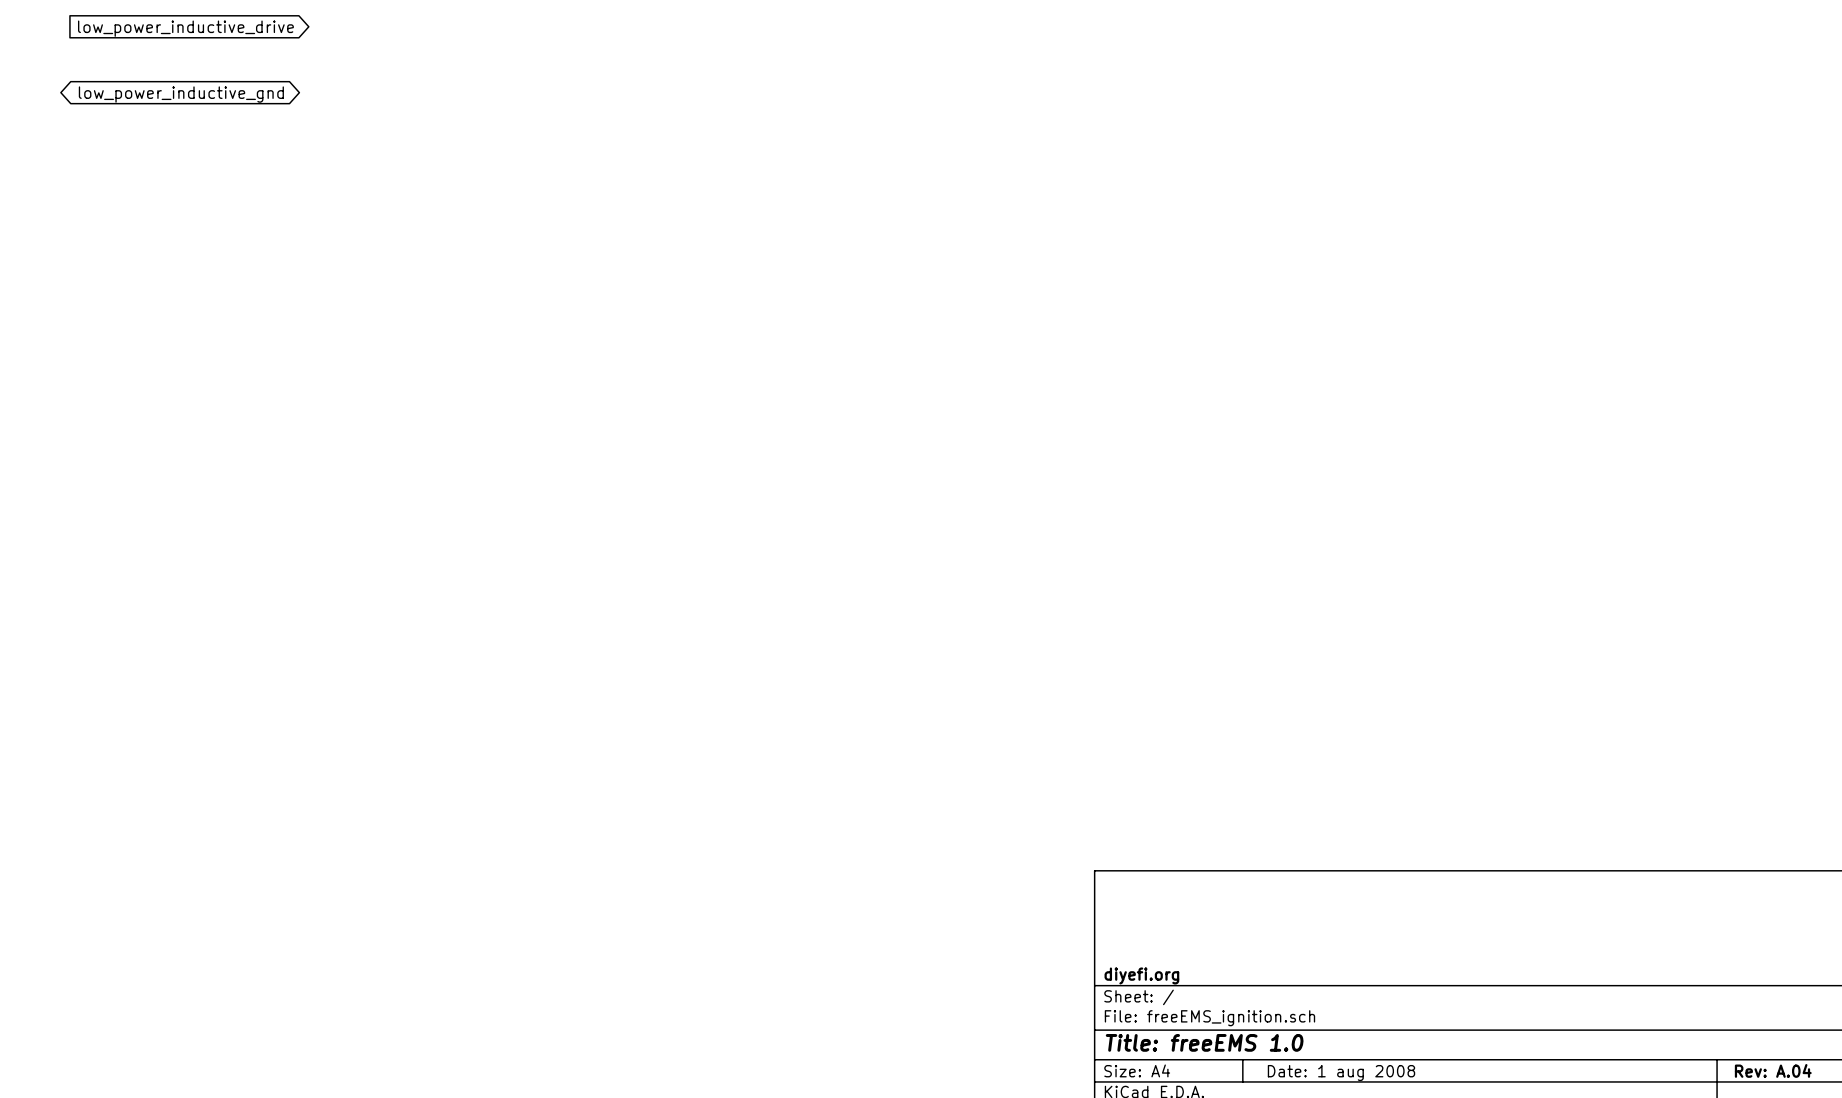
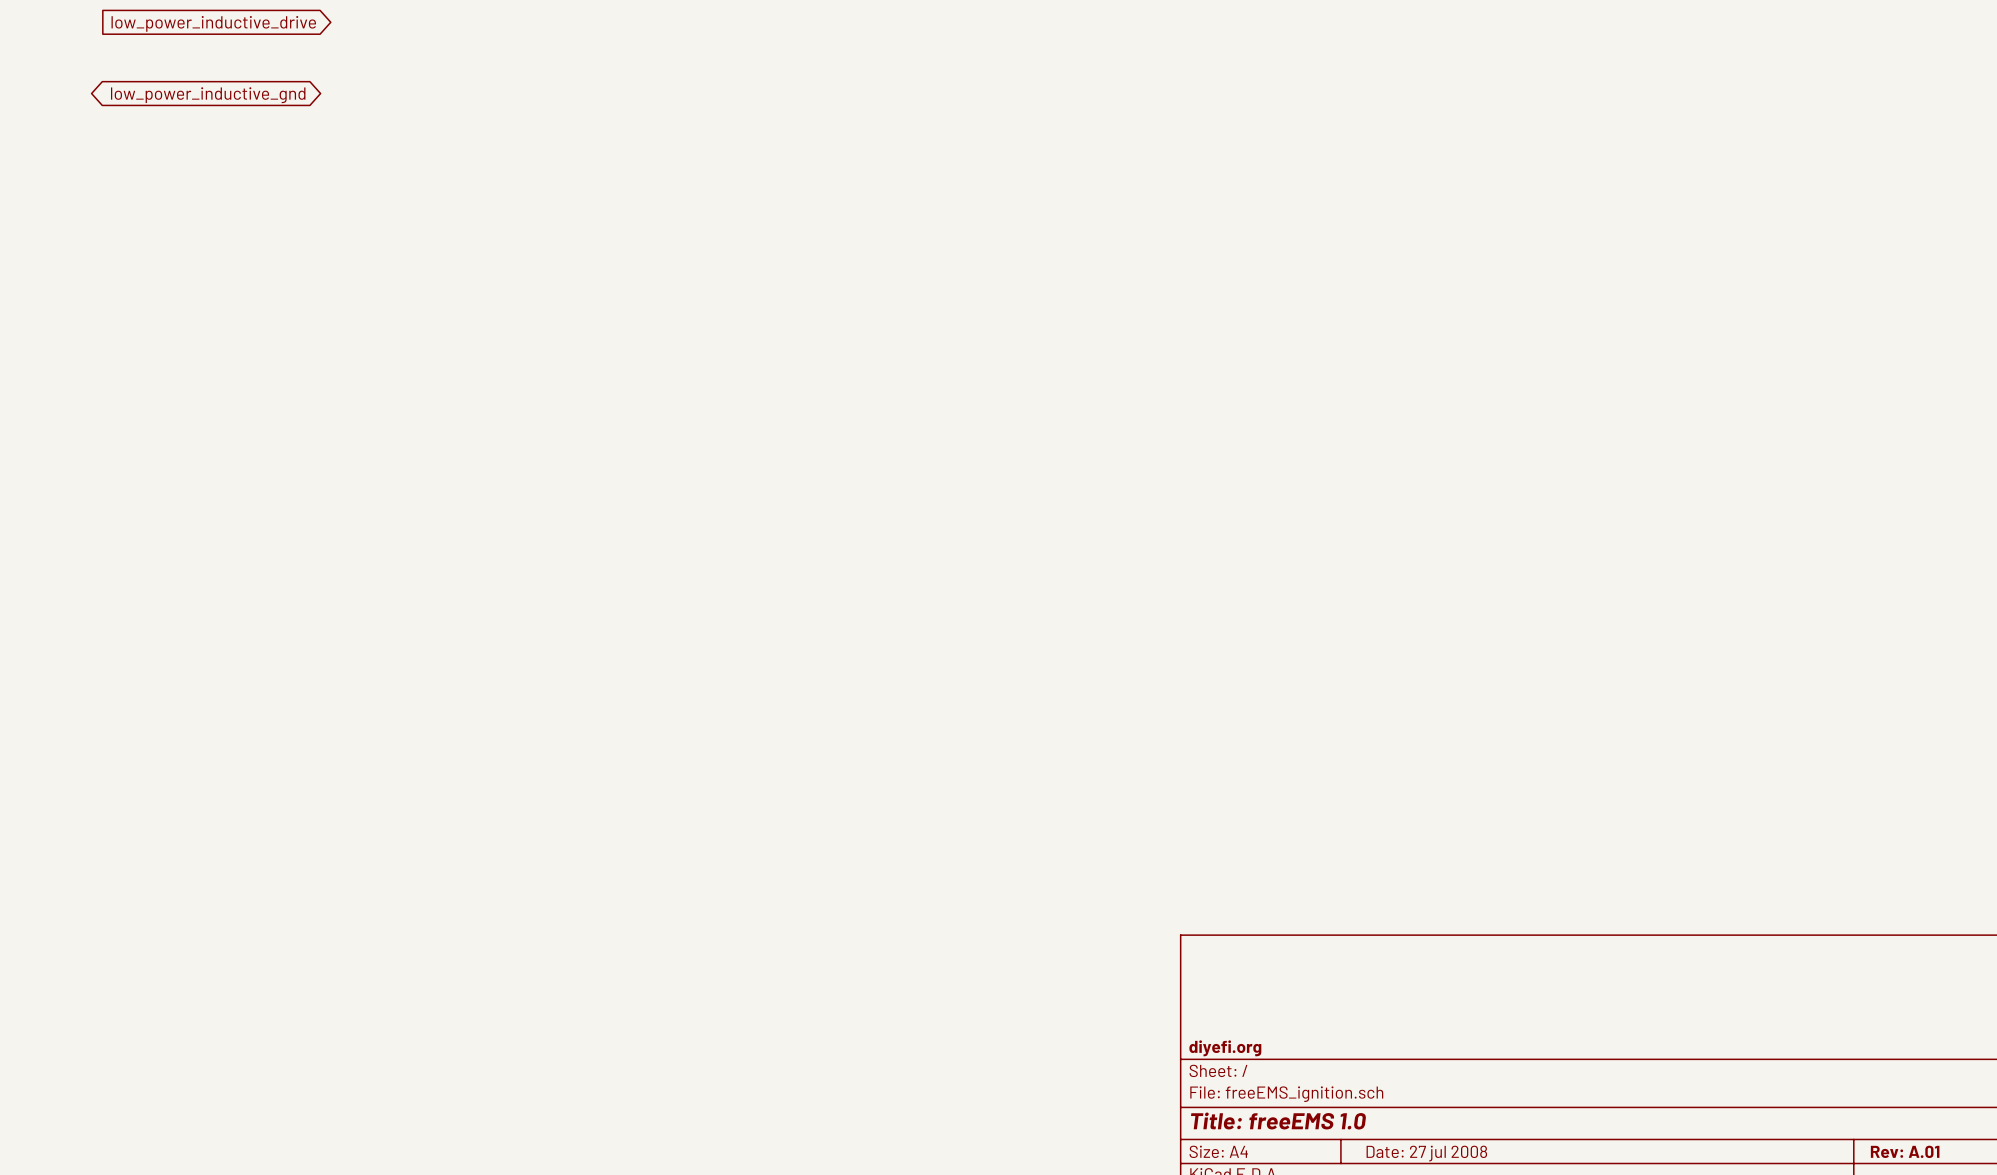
title block: Rev: A.04 (1773, 1070) -> Rev: A.01 (1905, 1151)
title block: Date: 1 aug 2008 (1341, 1073) -> Date: 27 jul 2008 (1426, 1153)

